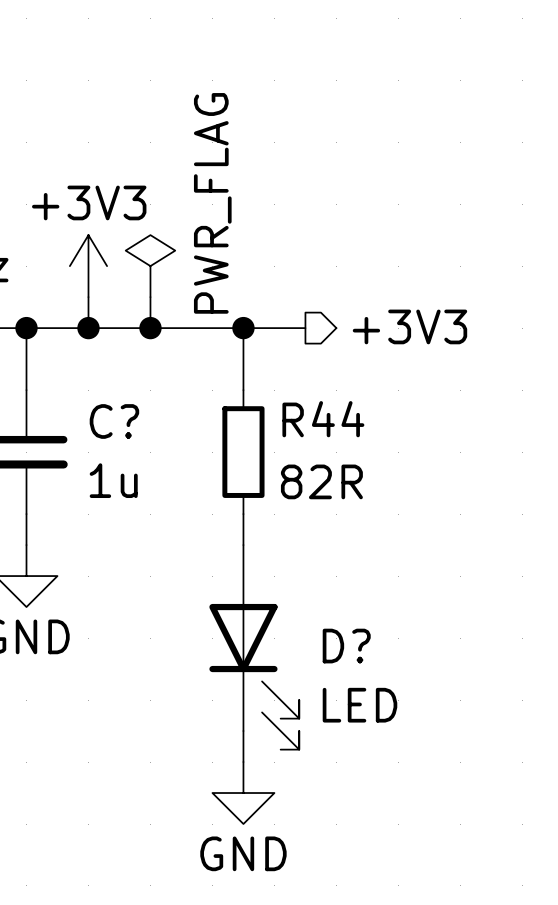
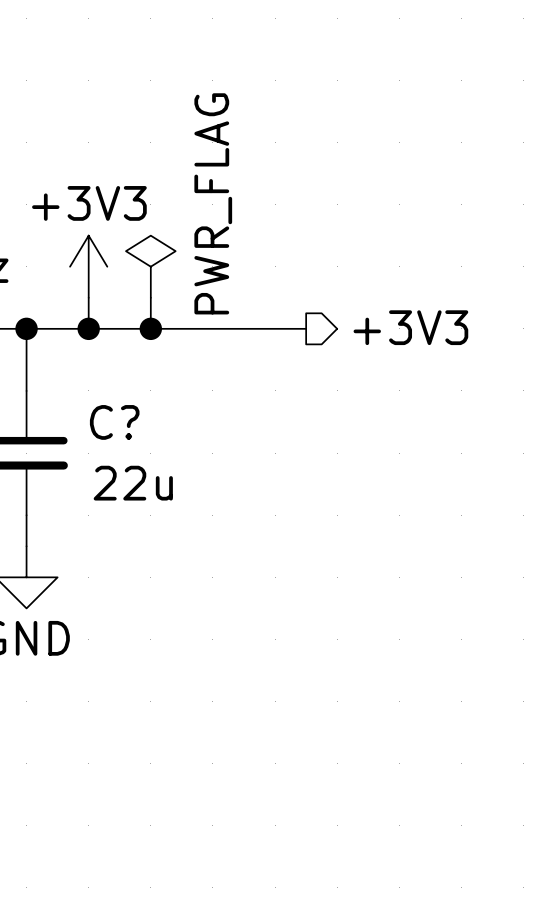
wire: (243, 328) (243, 390) -> none
junction: (243, 328) -> none
R44: 82R (243, 452) -> none
C? value: 1u (113, 480) -> 22u (133, 483)
wire: (243, 514) (243, 545) -> none
D?: LED (254, 647) -> none
wire: (243, 731) (243, 762) -> none
power symbol: GND (243, 793) -> none

